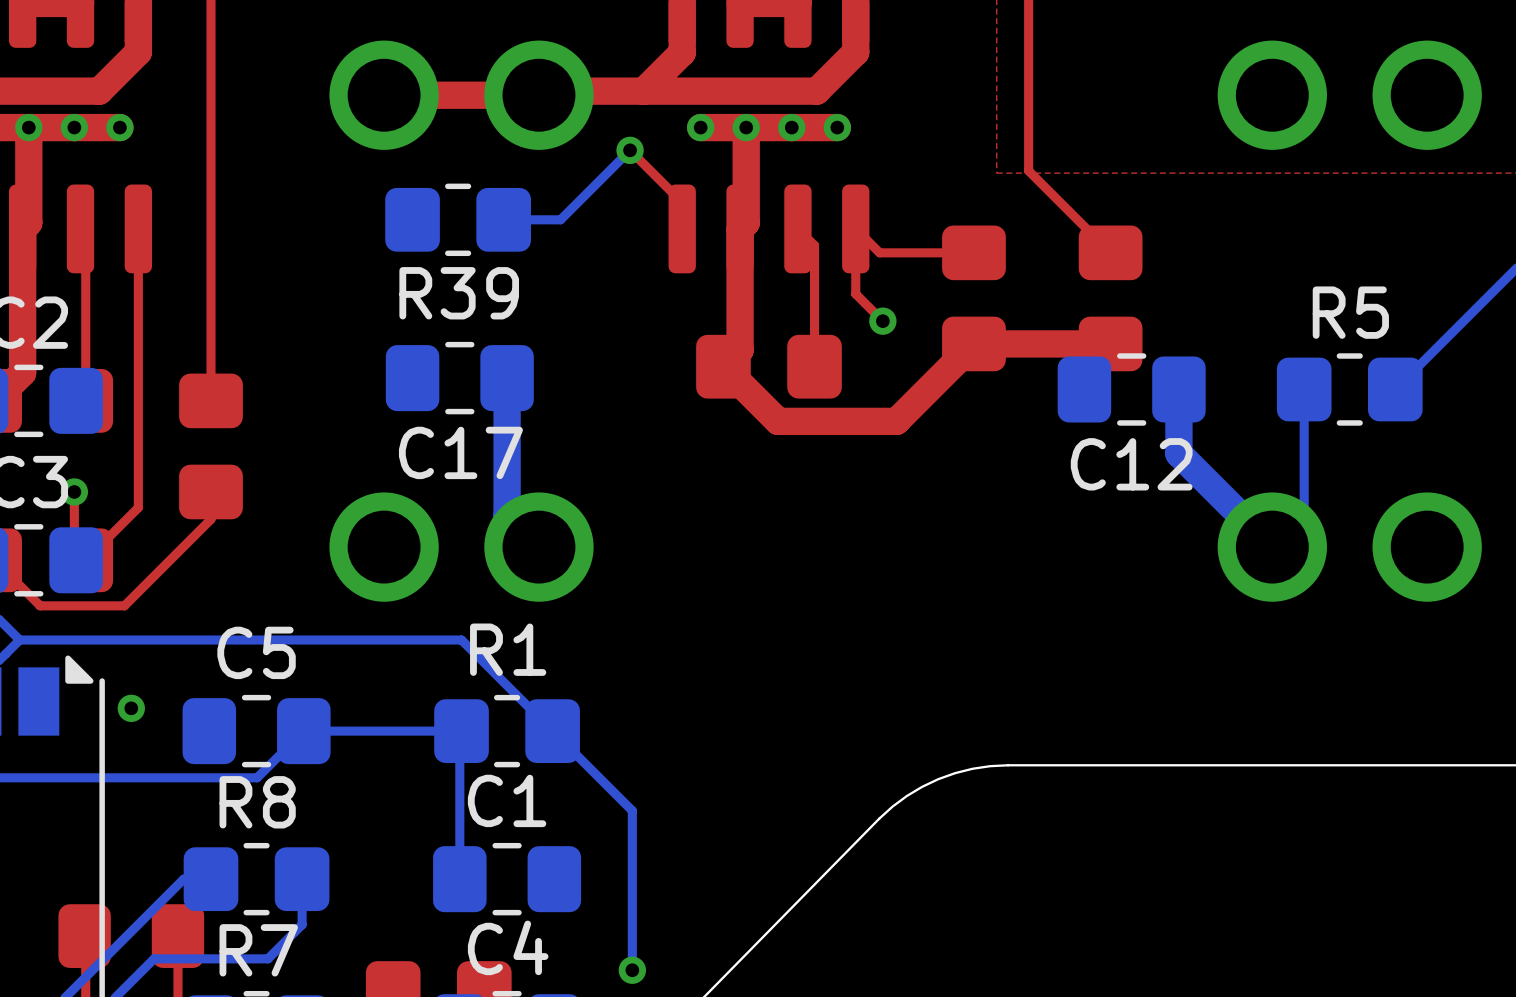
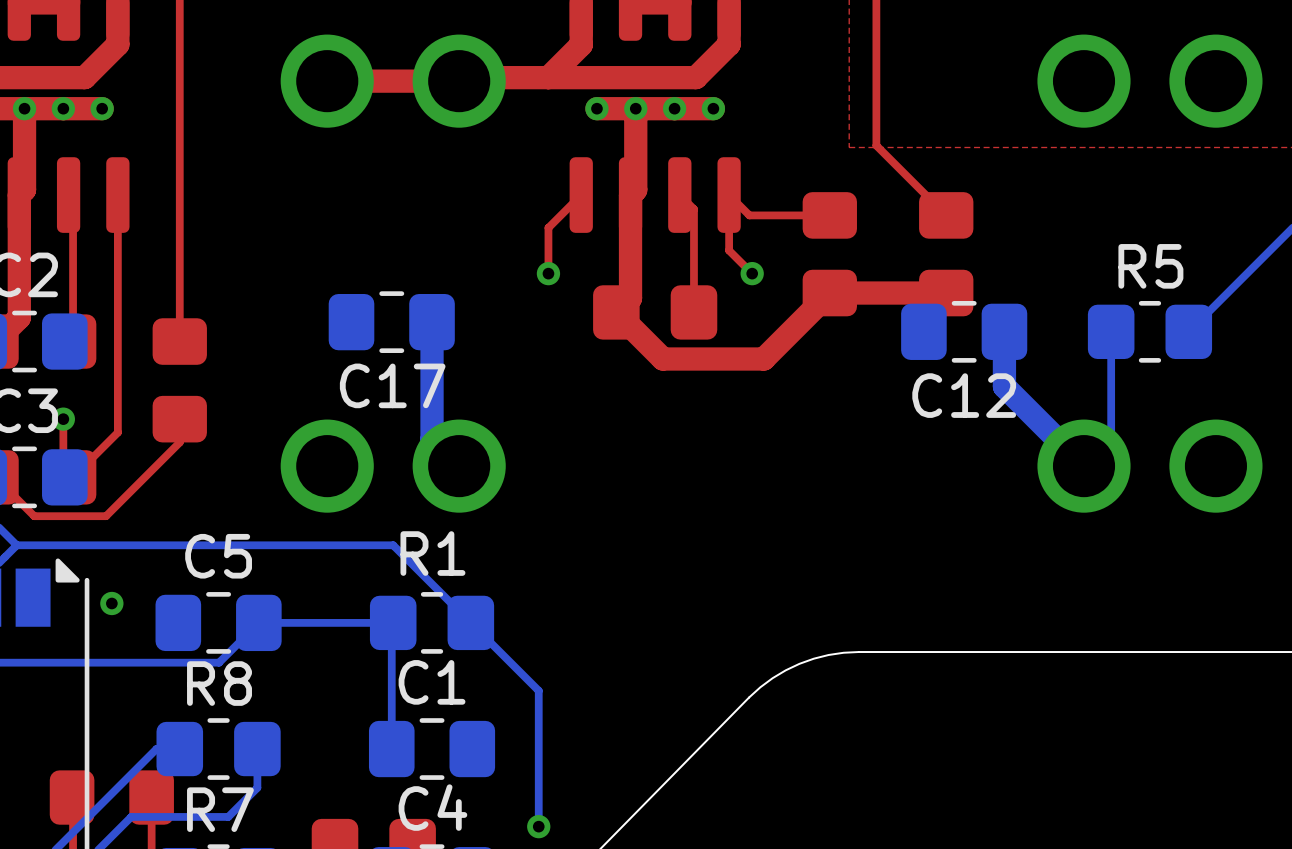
bottom track: (630, 150) (560, 219) (503, 219) -> none
top track: (630, 150) (682, 202) (682, 228) -> (548, 273) (548, 227) (581, 195)
via position: (630, 150) -> (548, 273)
R39: (458, 219) -> none

